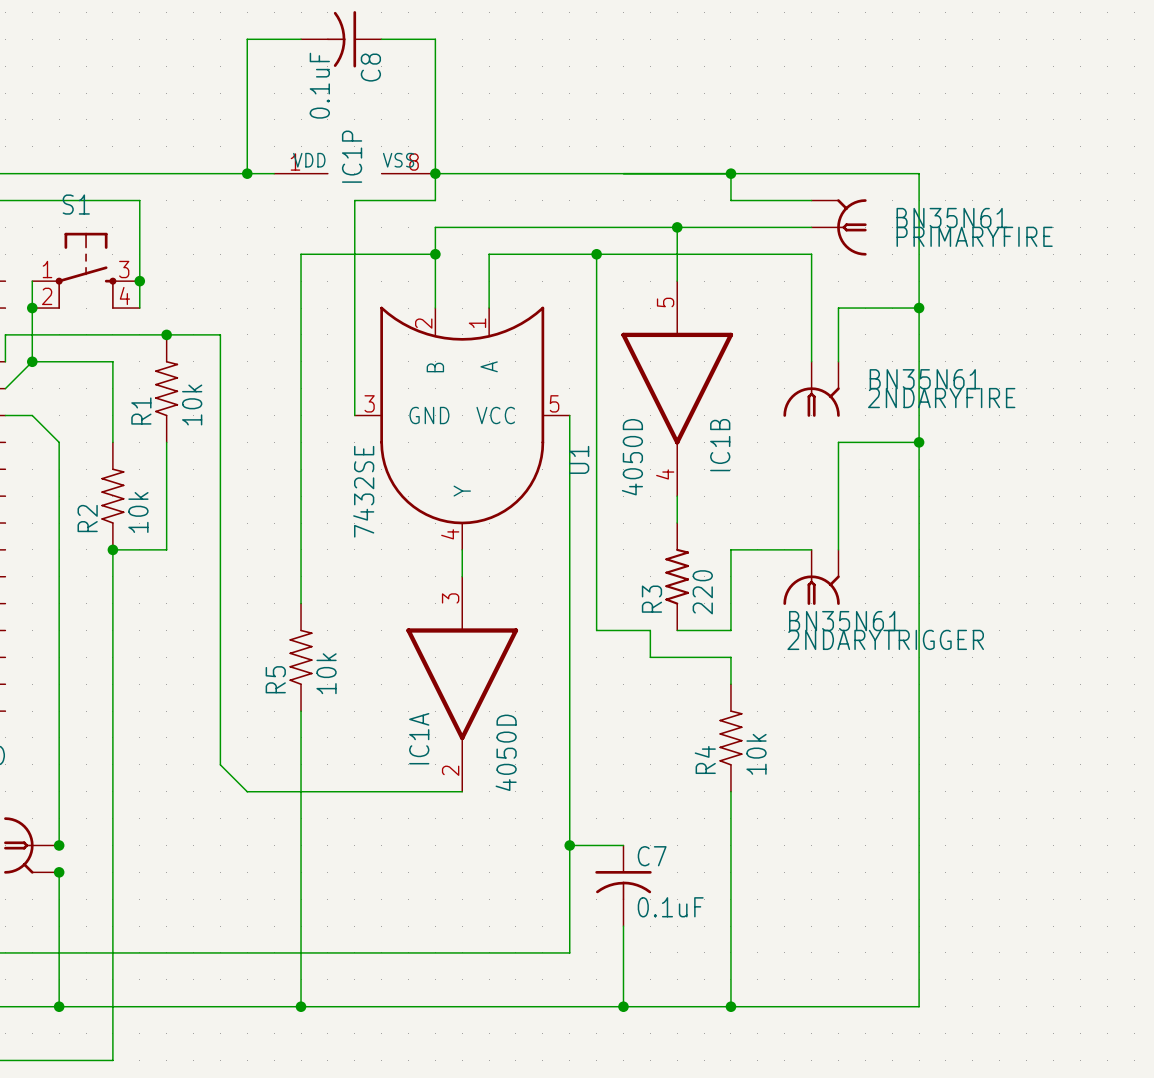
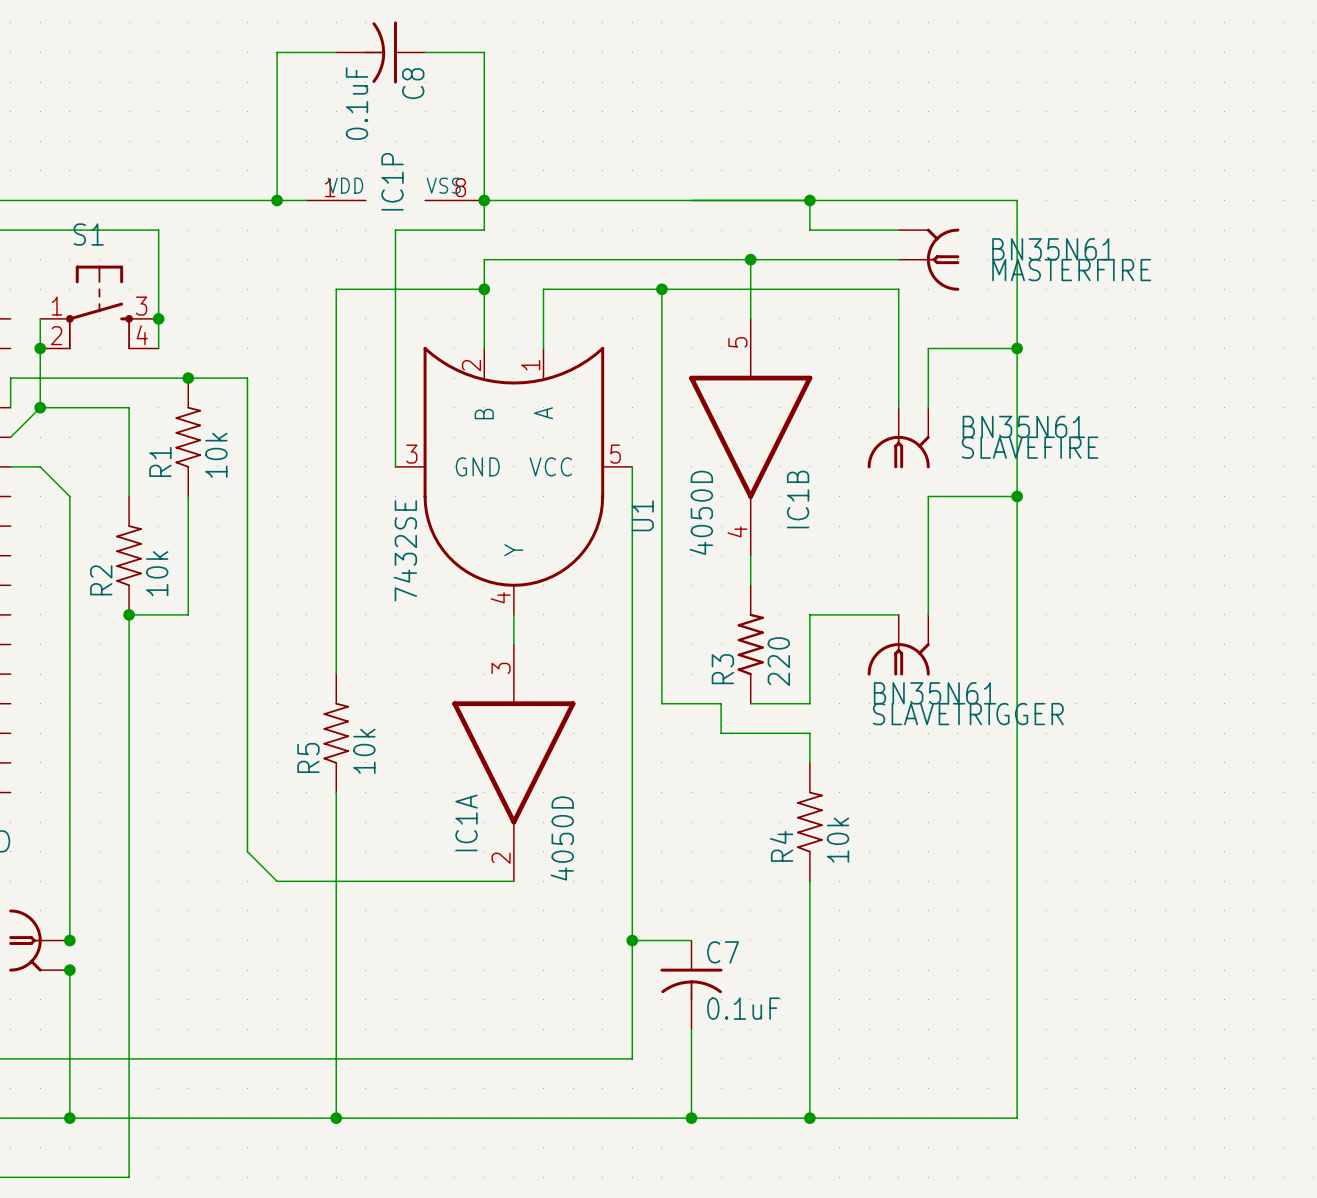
PRIMARYFIRE name: PRIMARYFIRE (974, 236) -> MASTERFIRE (1071, 270)
2NDARYFIRE name: 2NDARYFIRE (941, 398) -> SLAVEFIRE (1030, 447)
2NDARYTRIGGER name: 2NDARYTRIGGER (885, 639) -> SLAVETRIGGER (968, 714)

